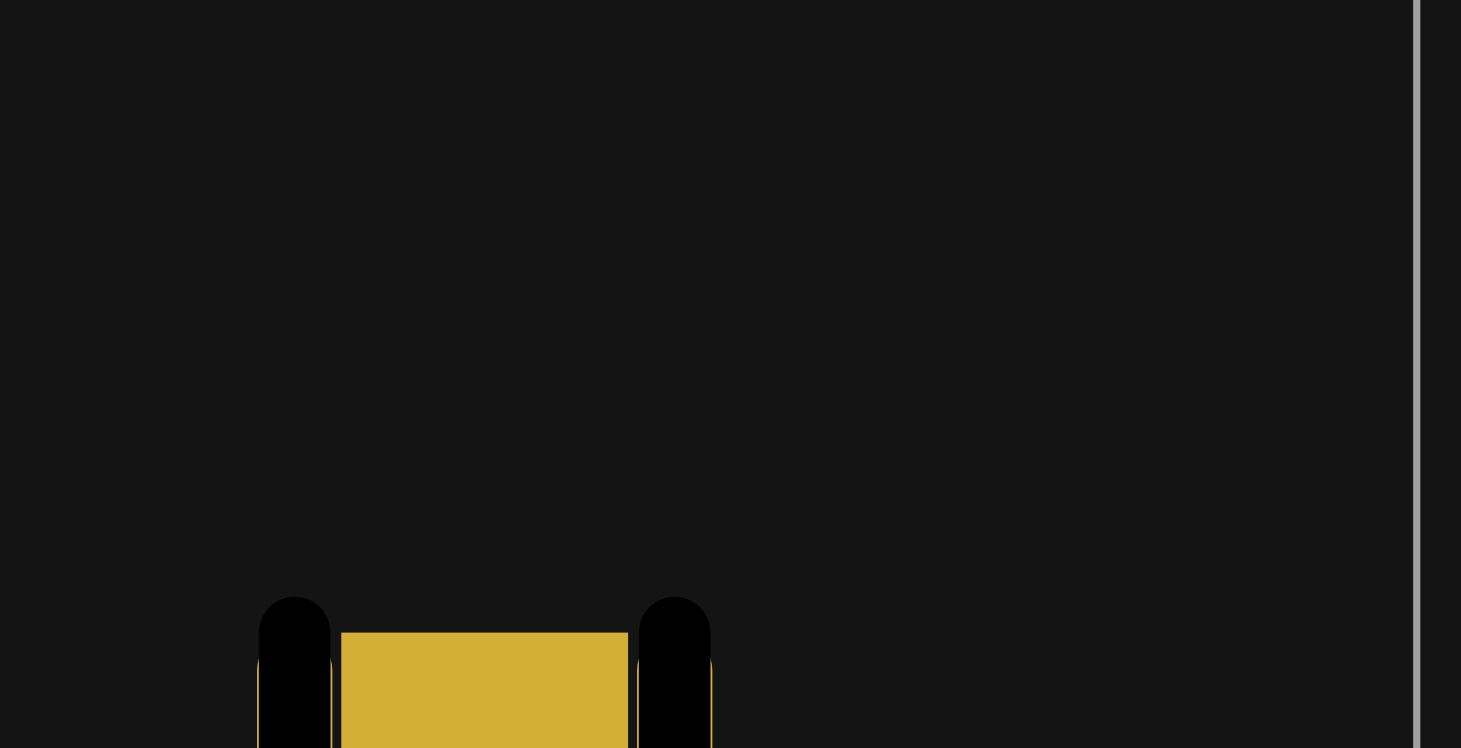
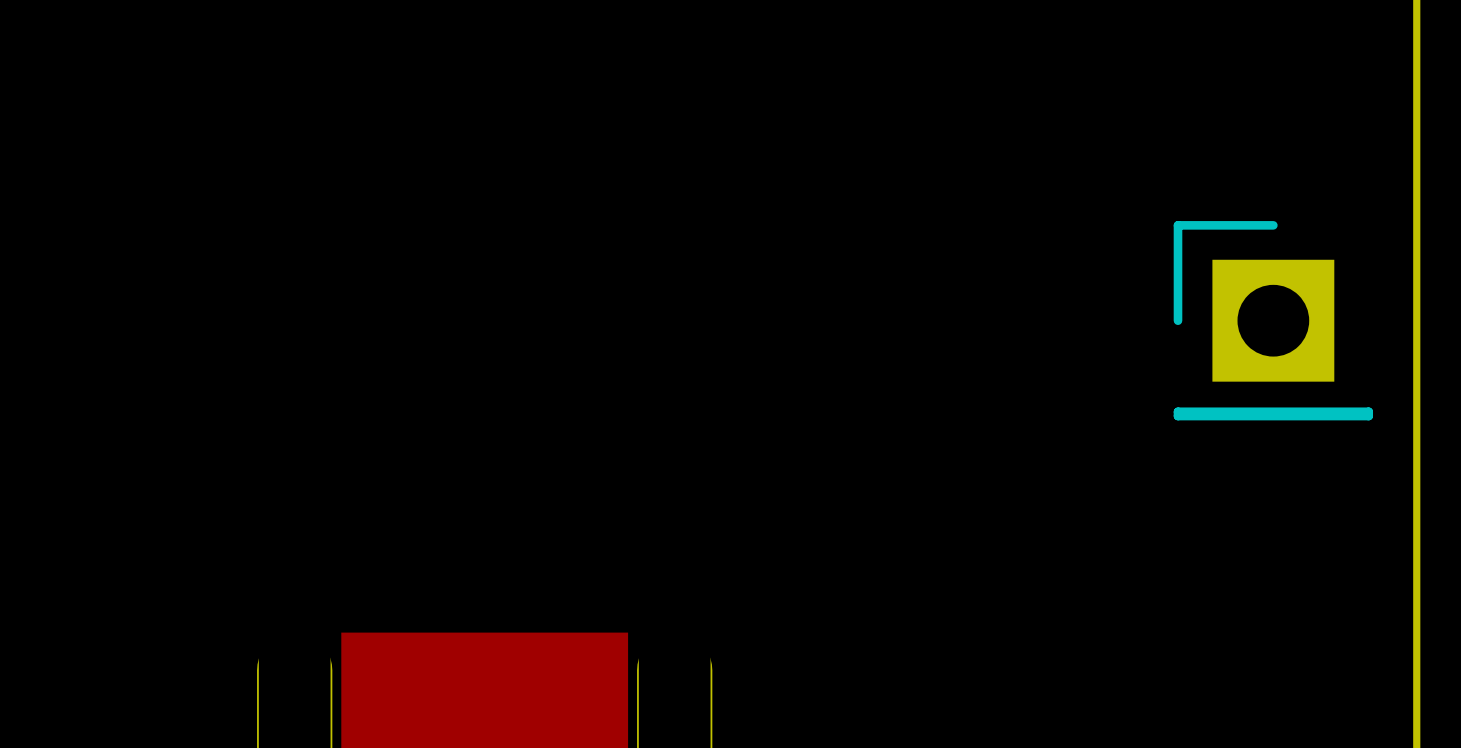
part: none -> (1273, 320)

